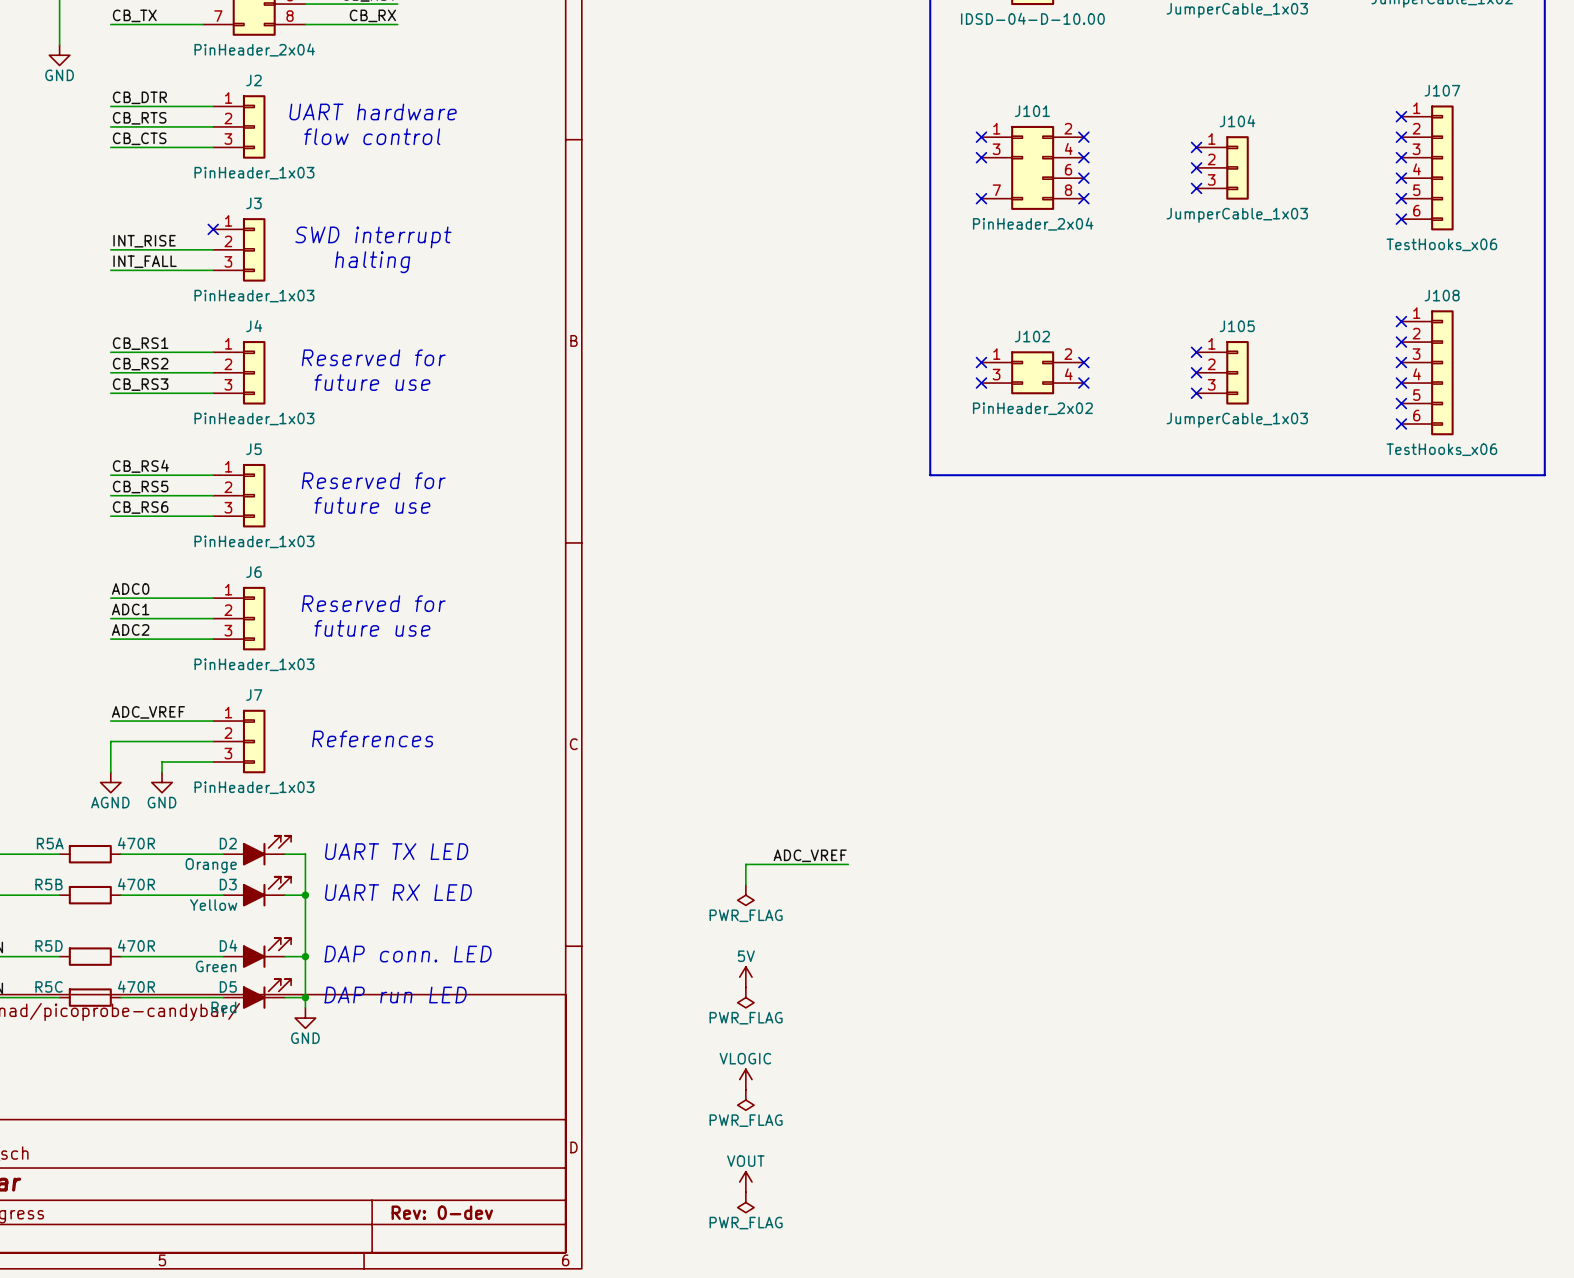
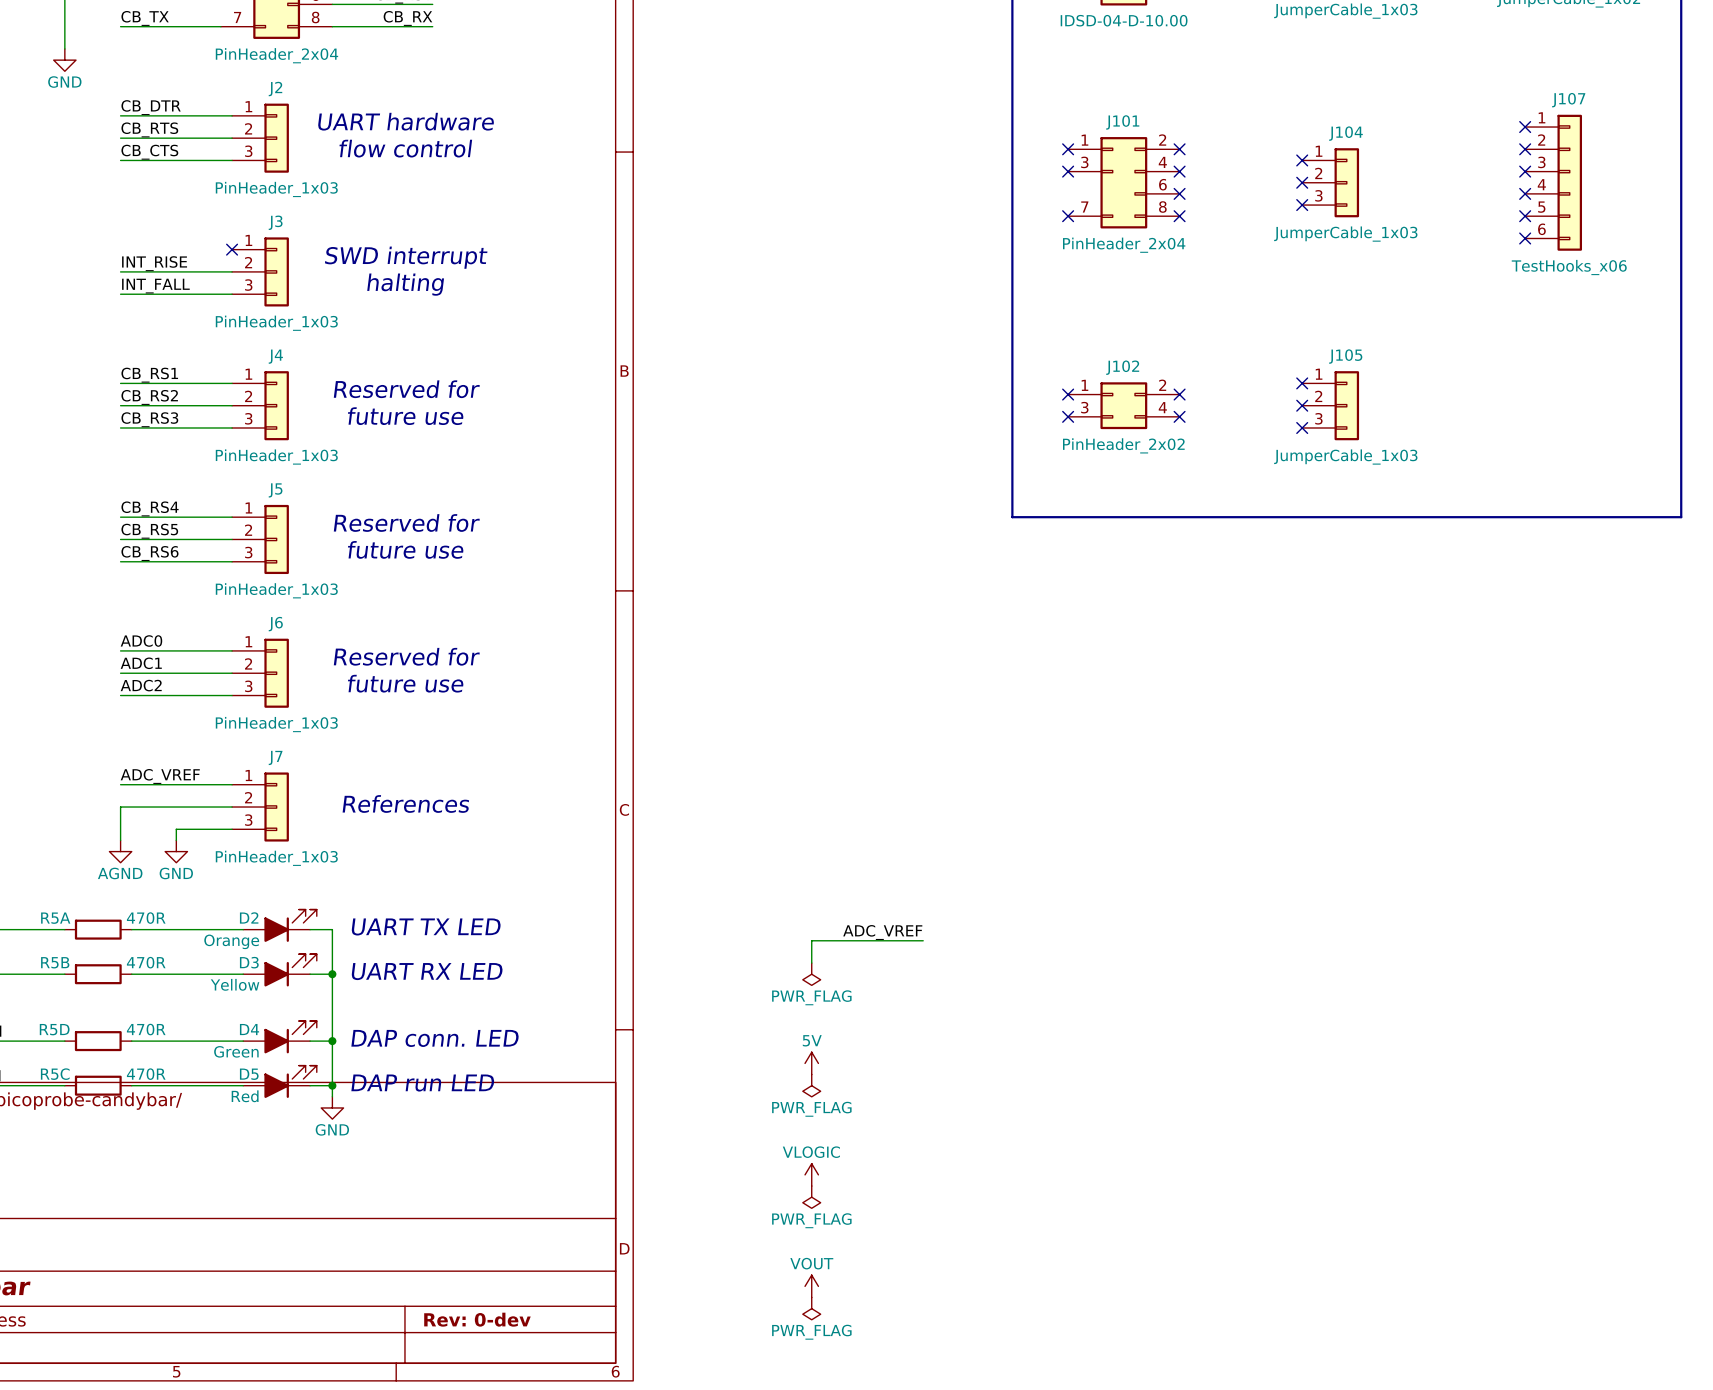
no-connect mark: (1401, 321) -> none
no-connect mark: (1401, 342) -> none
no-connect mark: (1401, 362) -> none
J108: TestHooks_x06 (1427, 372) -> none
no-connect mark: (1401, 383) -> none
no-connect mark: (1401, 403) -> none
no-connect mark: (1401, 423) -> none

